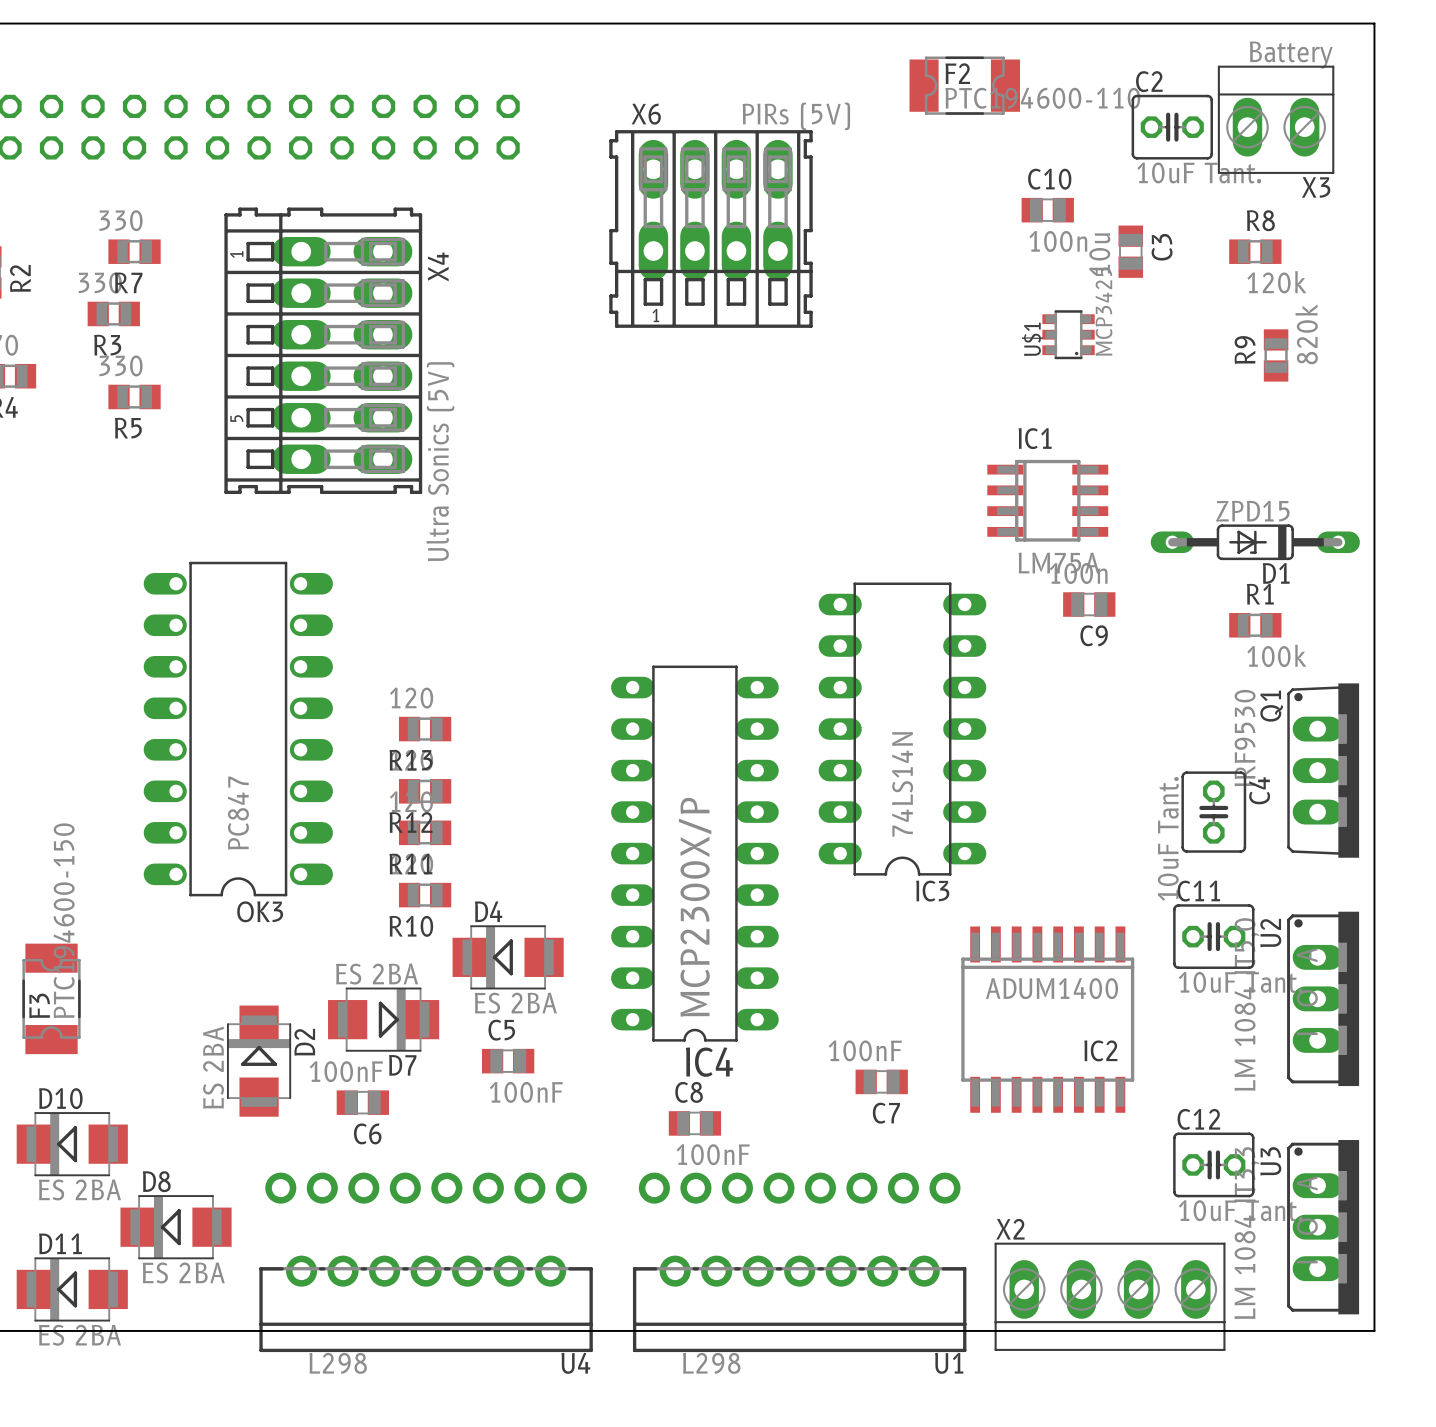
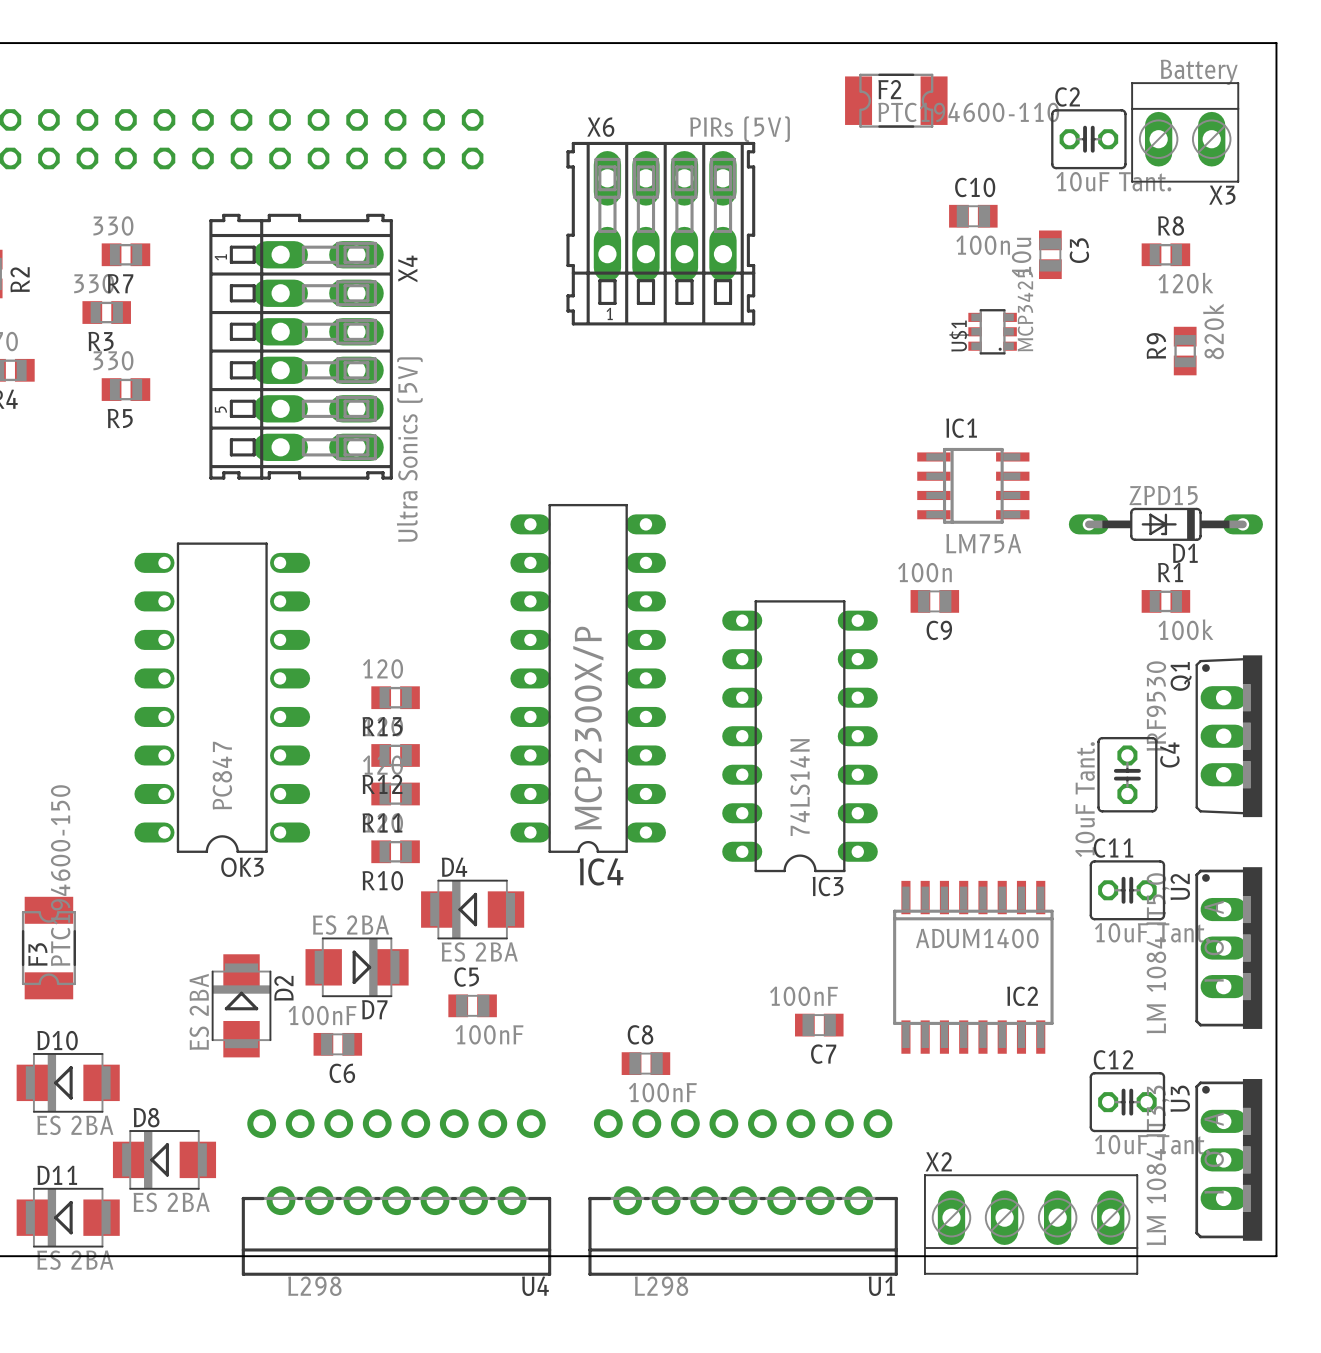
C9 position: (1089, 604) -> (934, 601)
IC3 position: (902, 729) -> (800, 736)
IC4 position: (694, 853) -> (588, 678)

